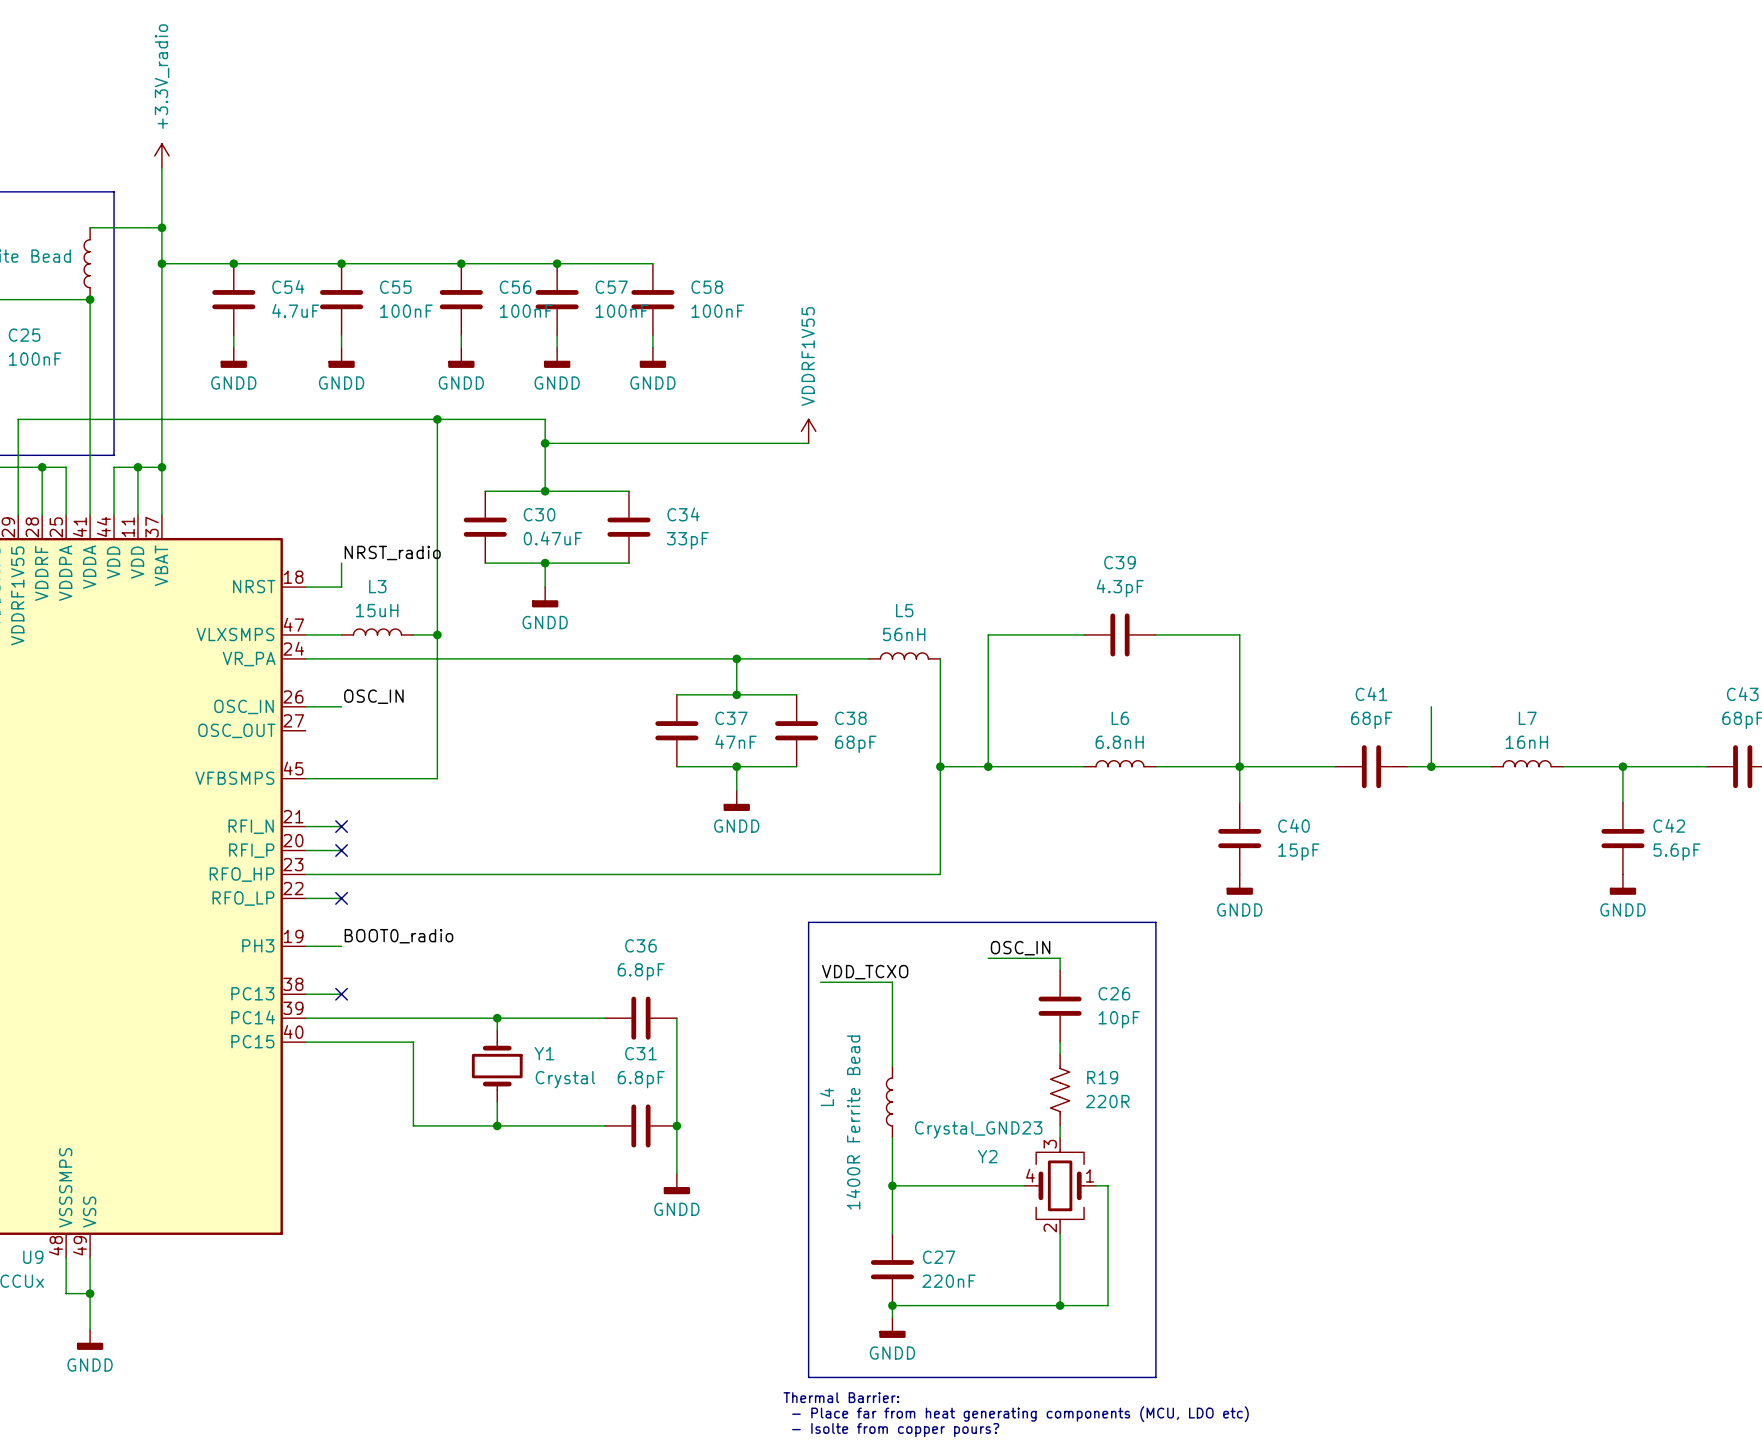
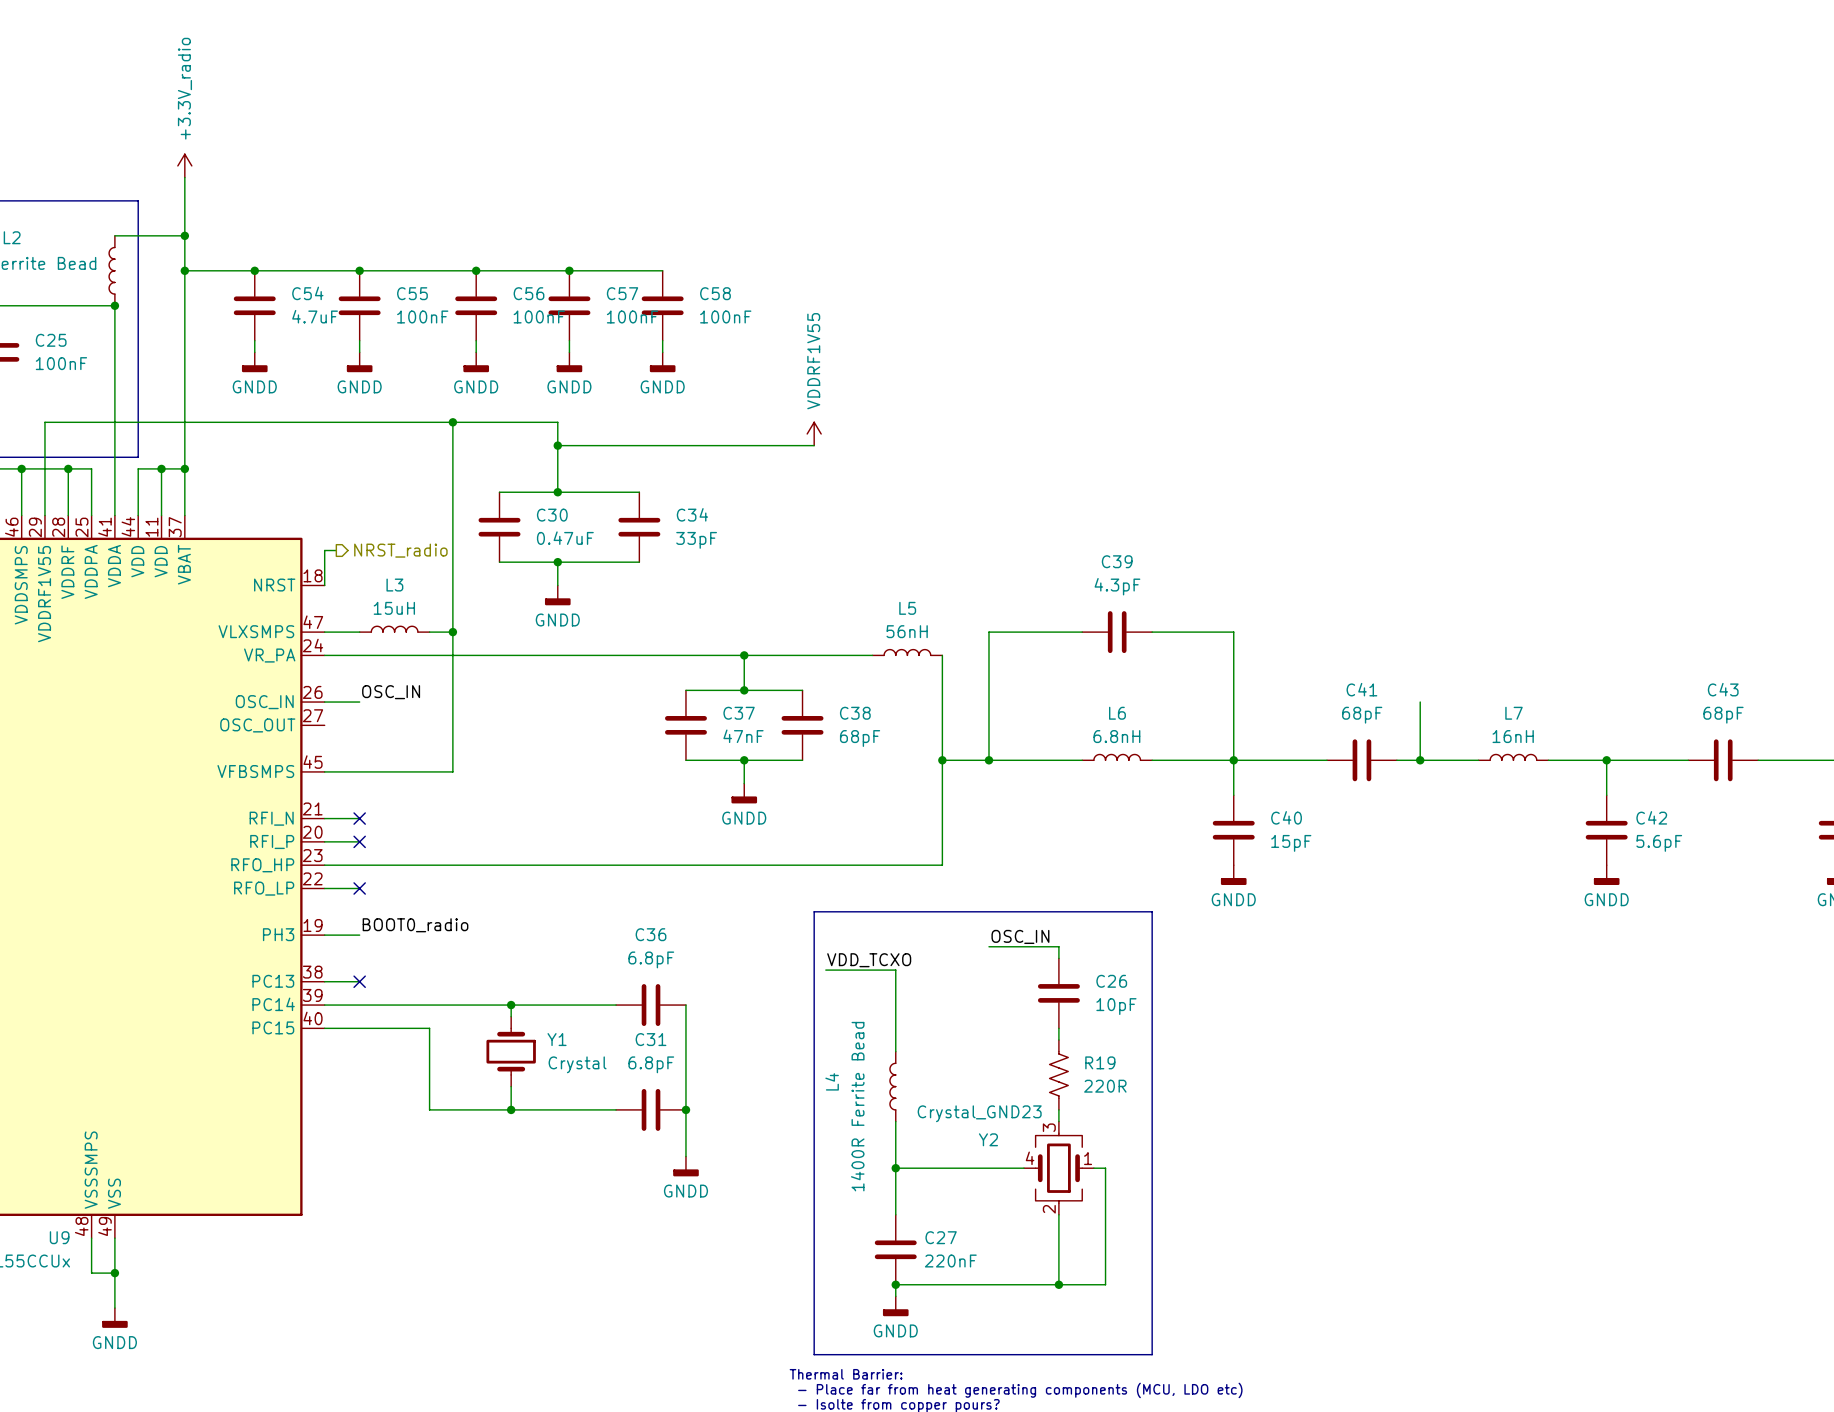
hierarchical label: none -> NRST_radio (400, 550)
label: NRST_radio (392, 552) -> none
wire: (341, 563) (341, 587) (305, 587) -> (336, 550) (324, 550) (324, 585)

